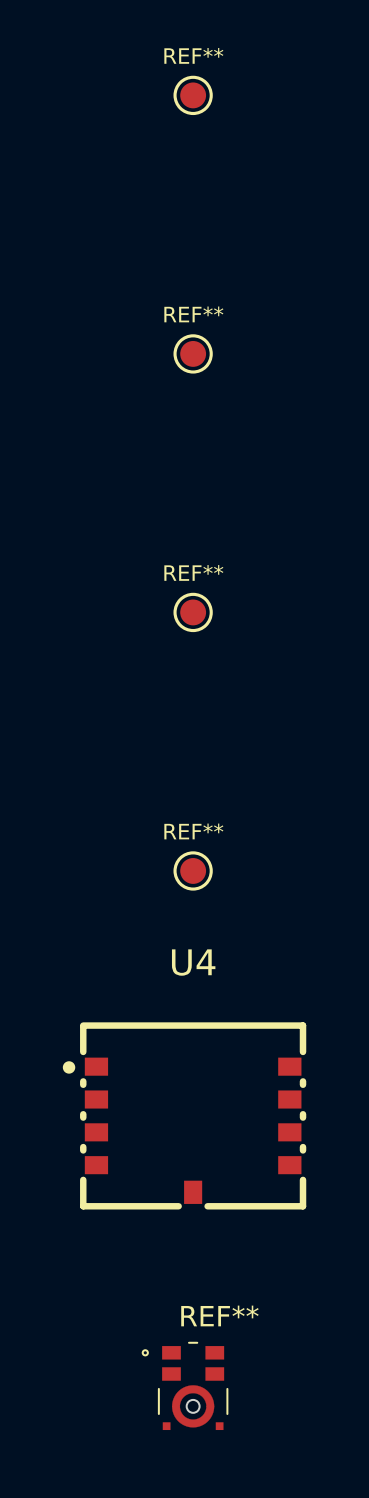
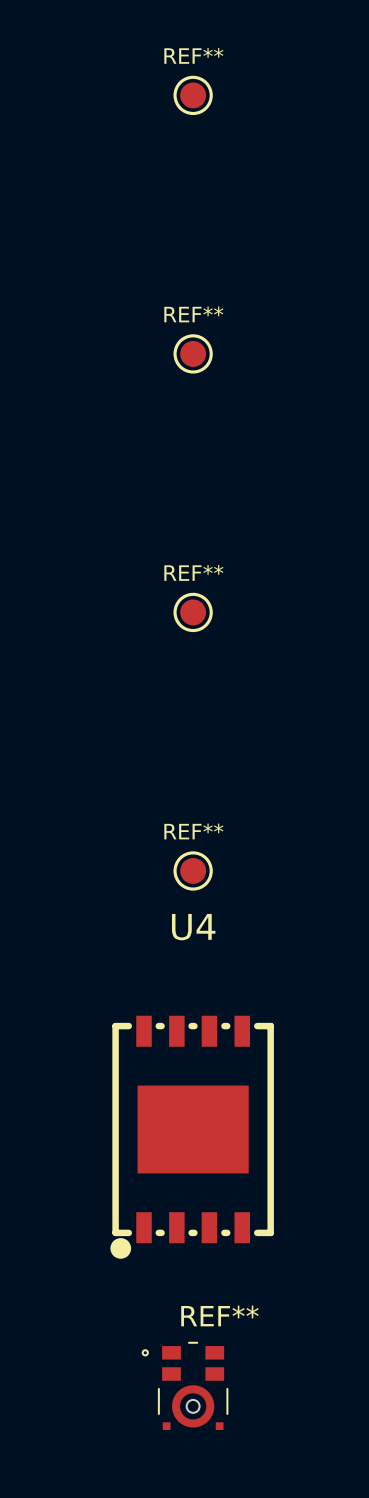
U4 name position: U4 (193, 962) -> U4 (193, 927)
U4 footprint: [62, 1022, 307, 1210] -> [110, 1015, 274, 1259]

